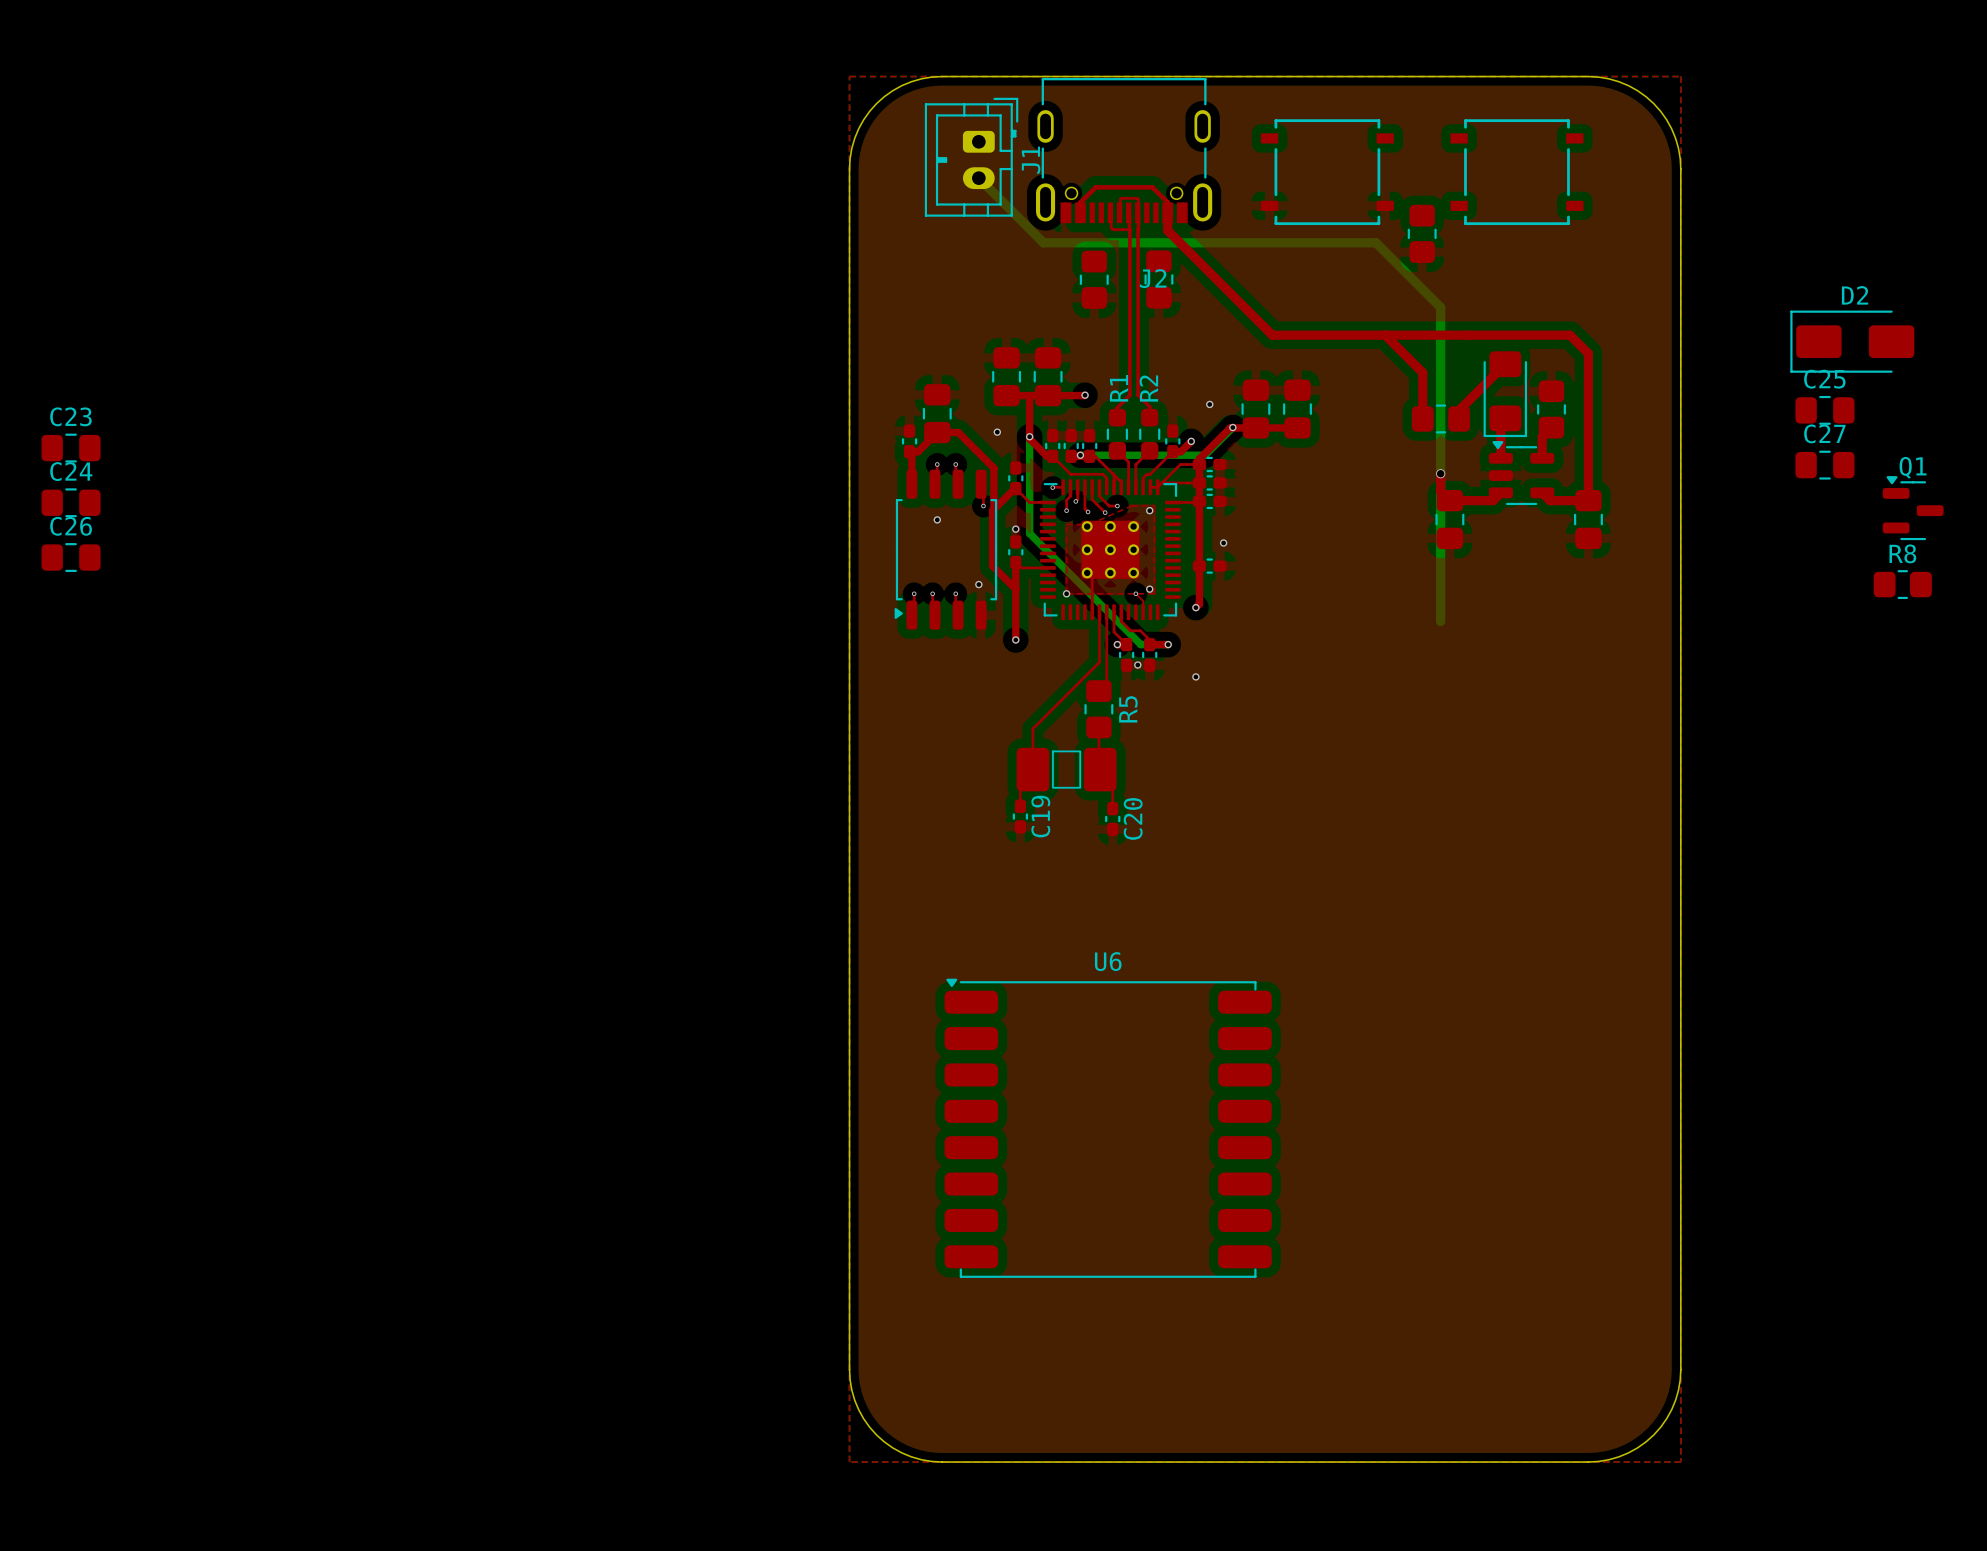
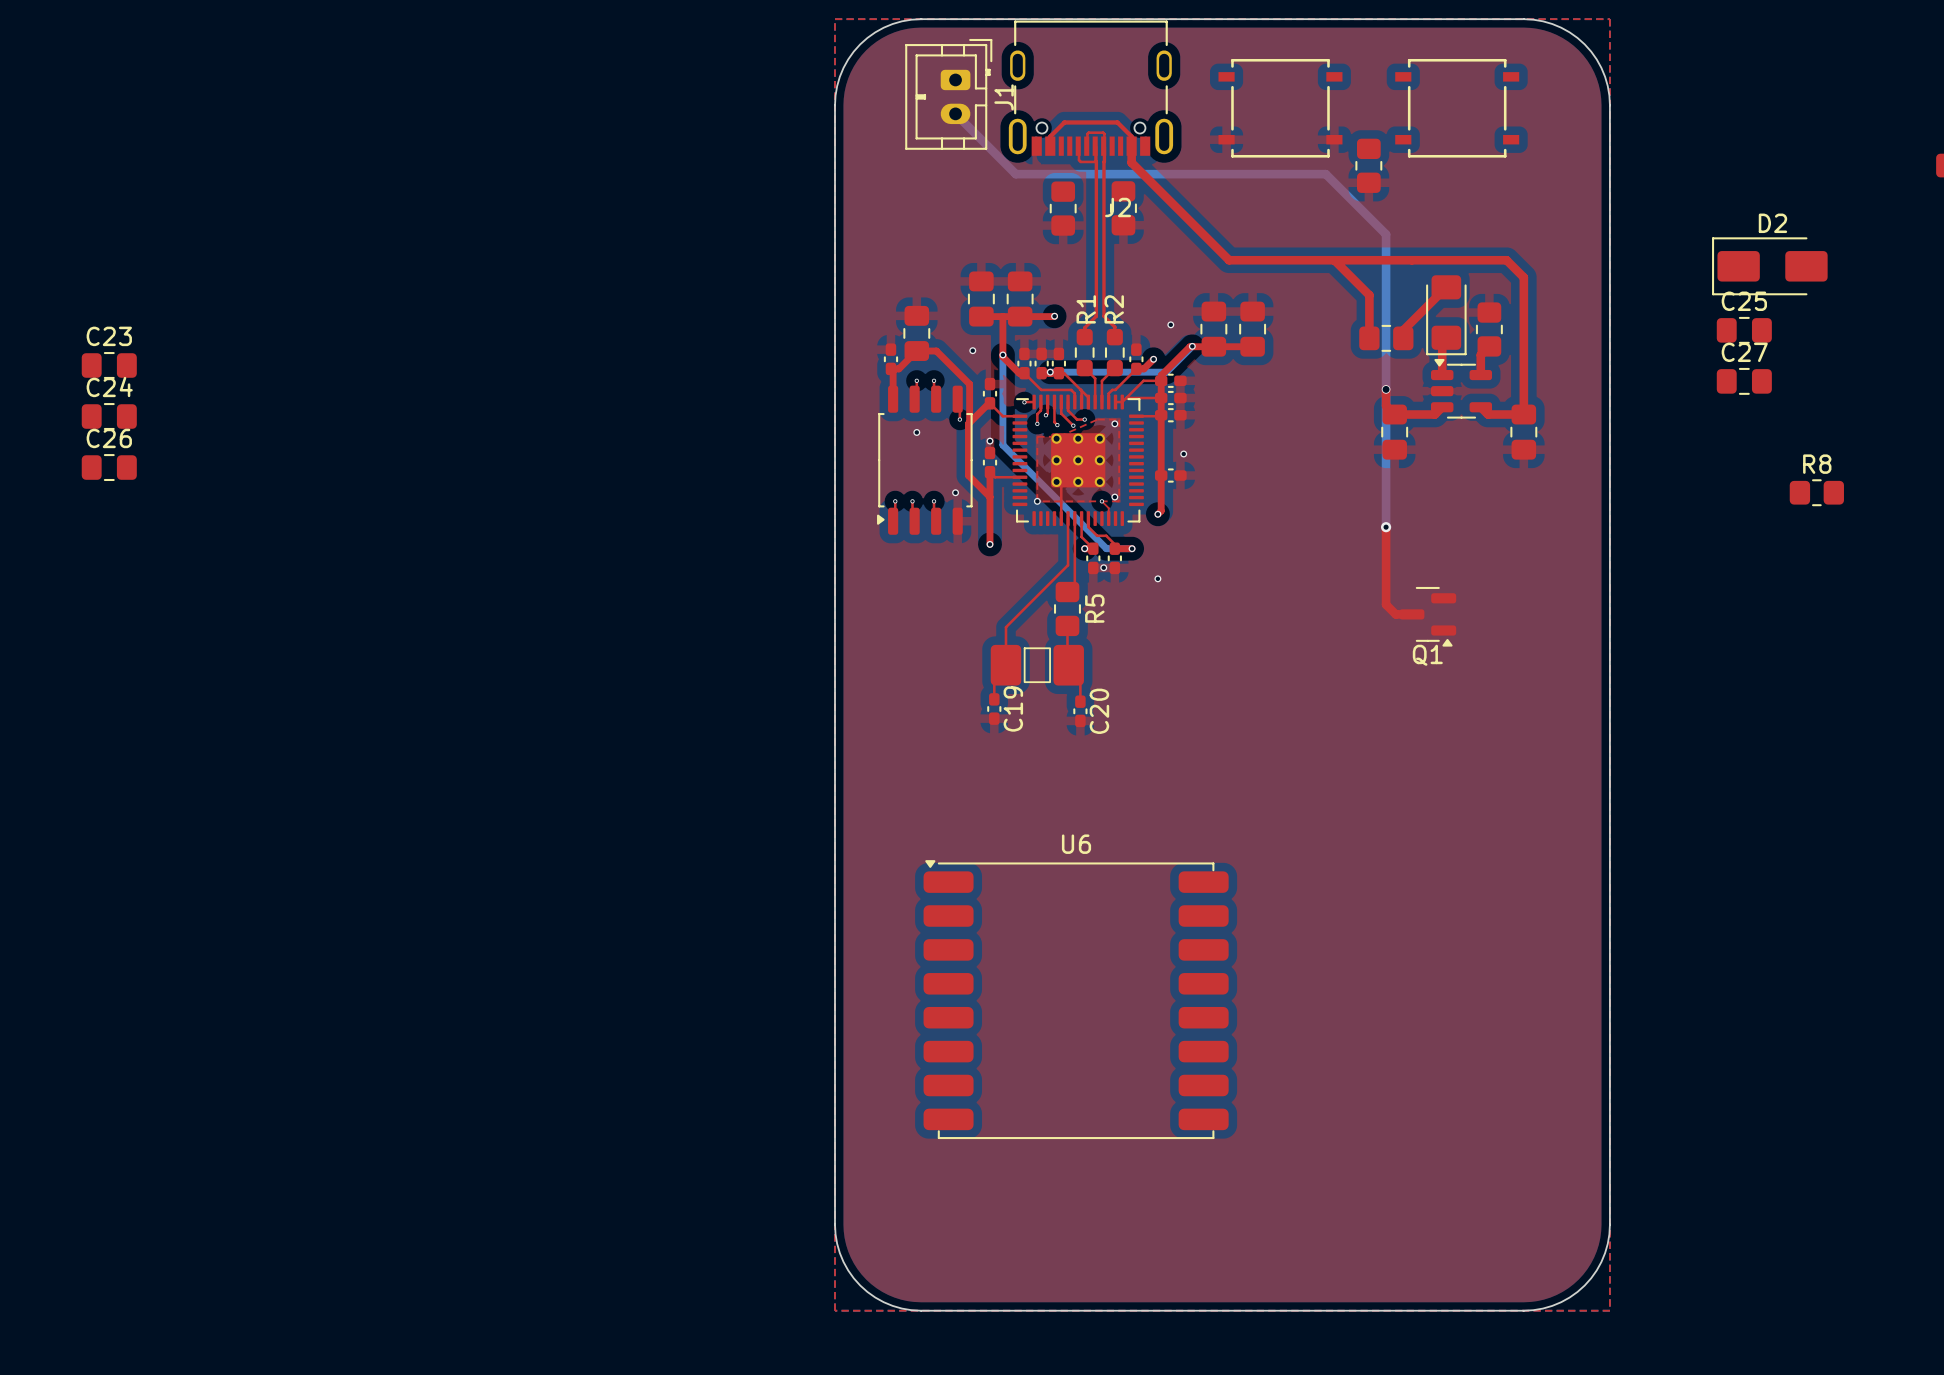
Q1 rotation: 0° (1913, 508) -> 180° (1427, 616)
Q1 position: (1913, 508) -> (1427, 616)
top track: none -> (1386, 527) (1386, 604) (1395, 614) (1411, 614)
via: none -> (1386, 527)

